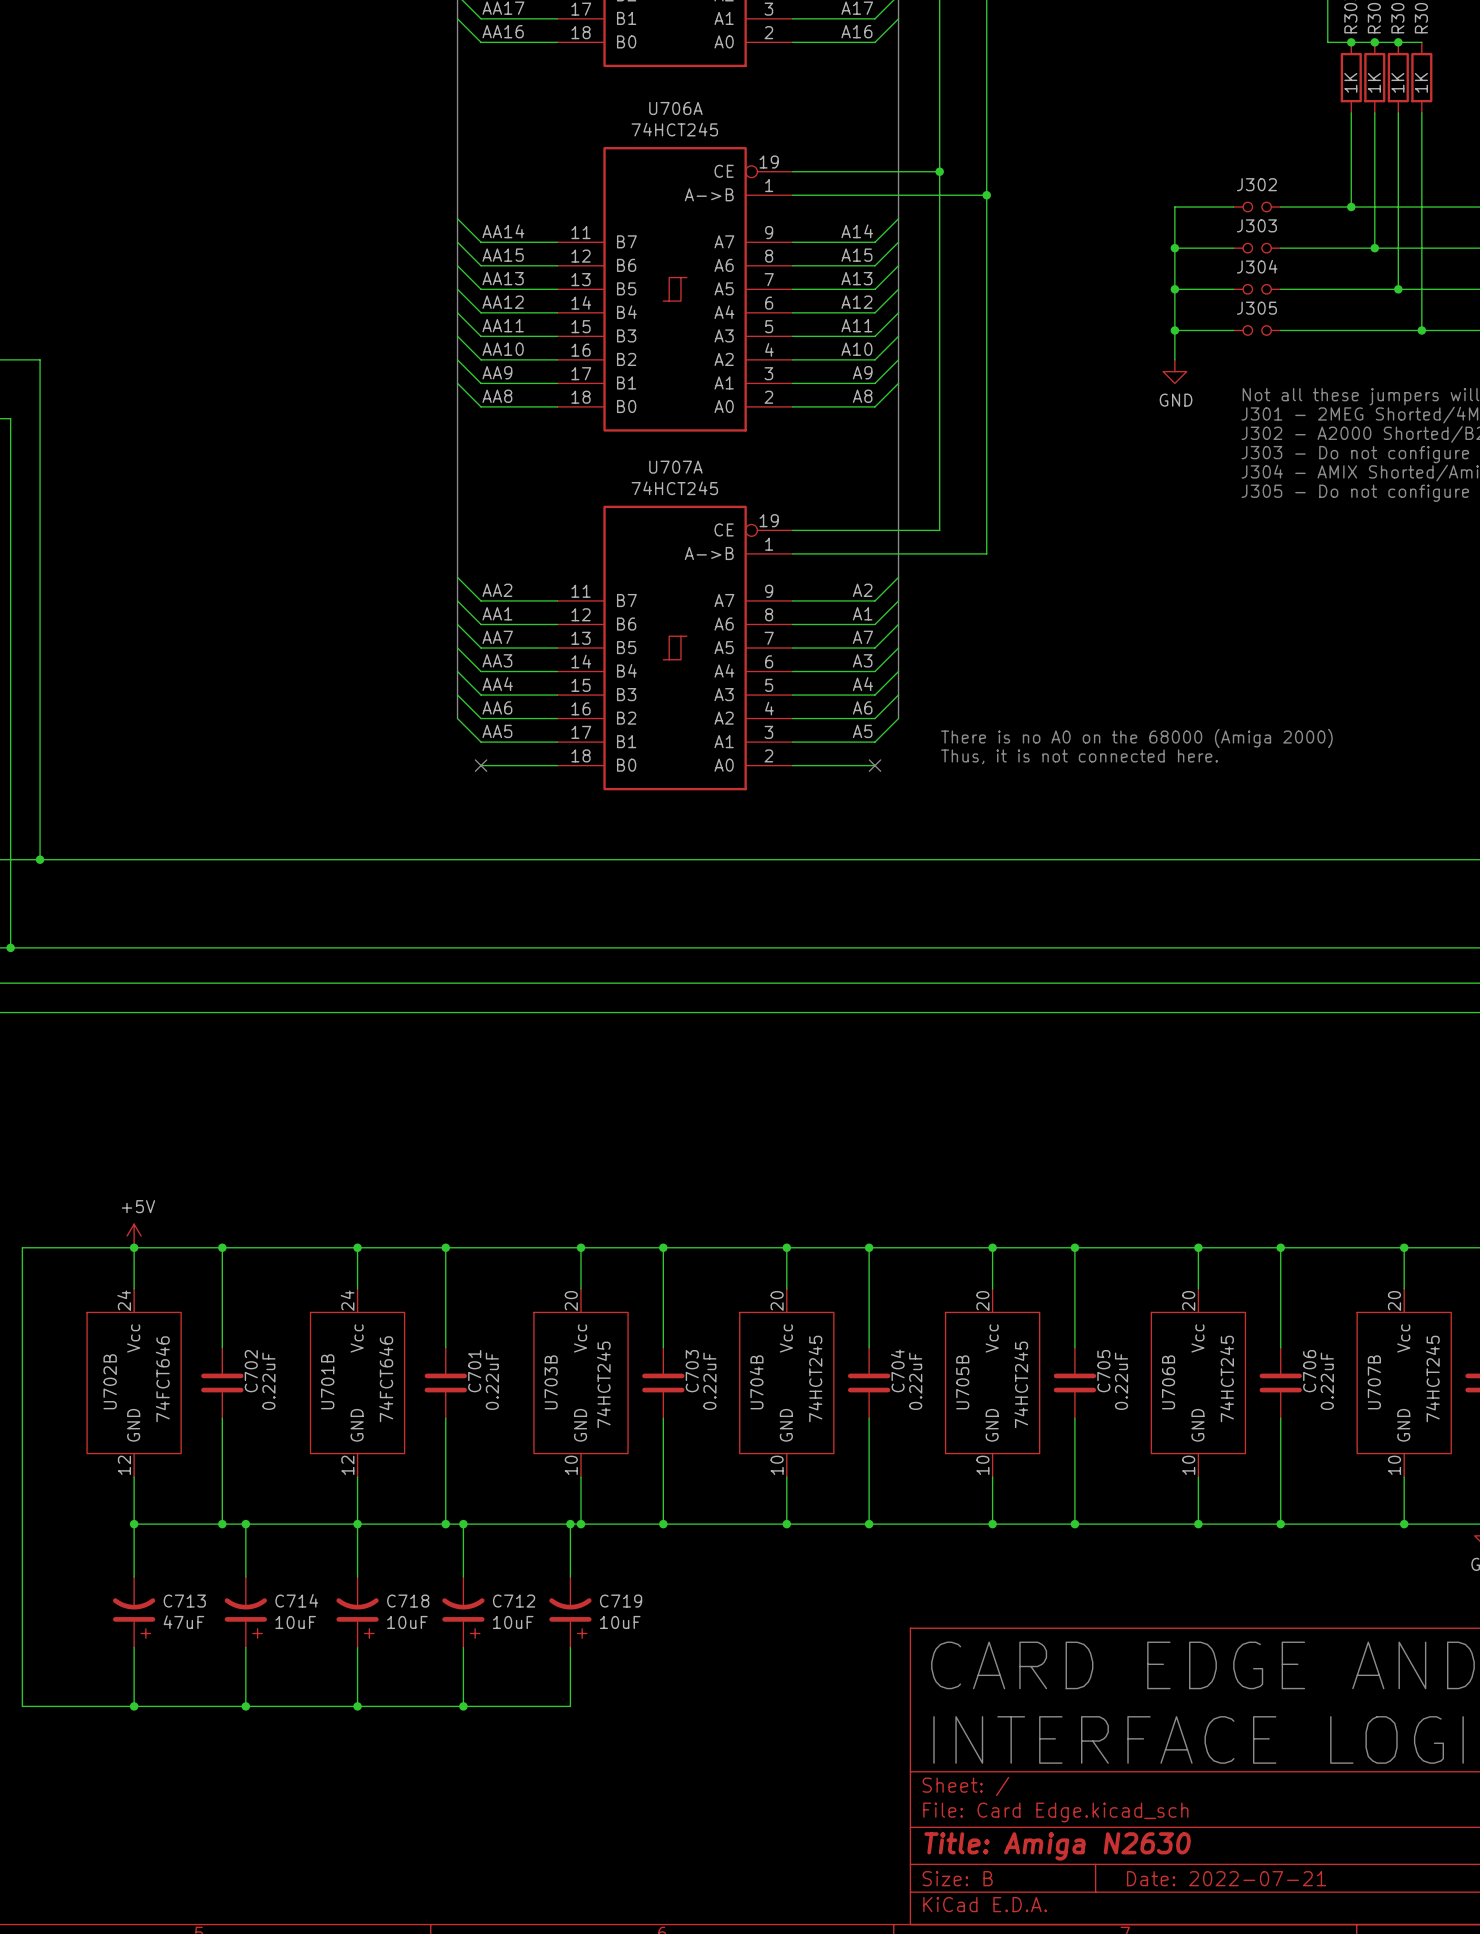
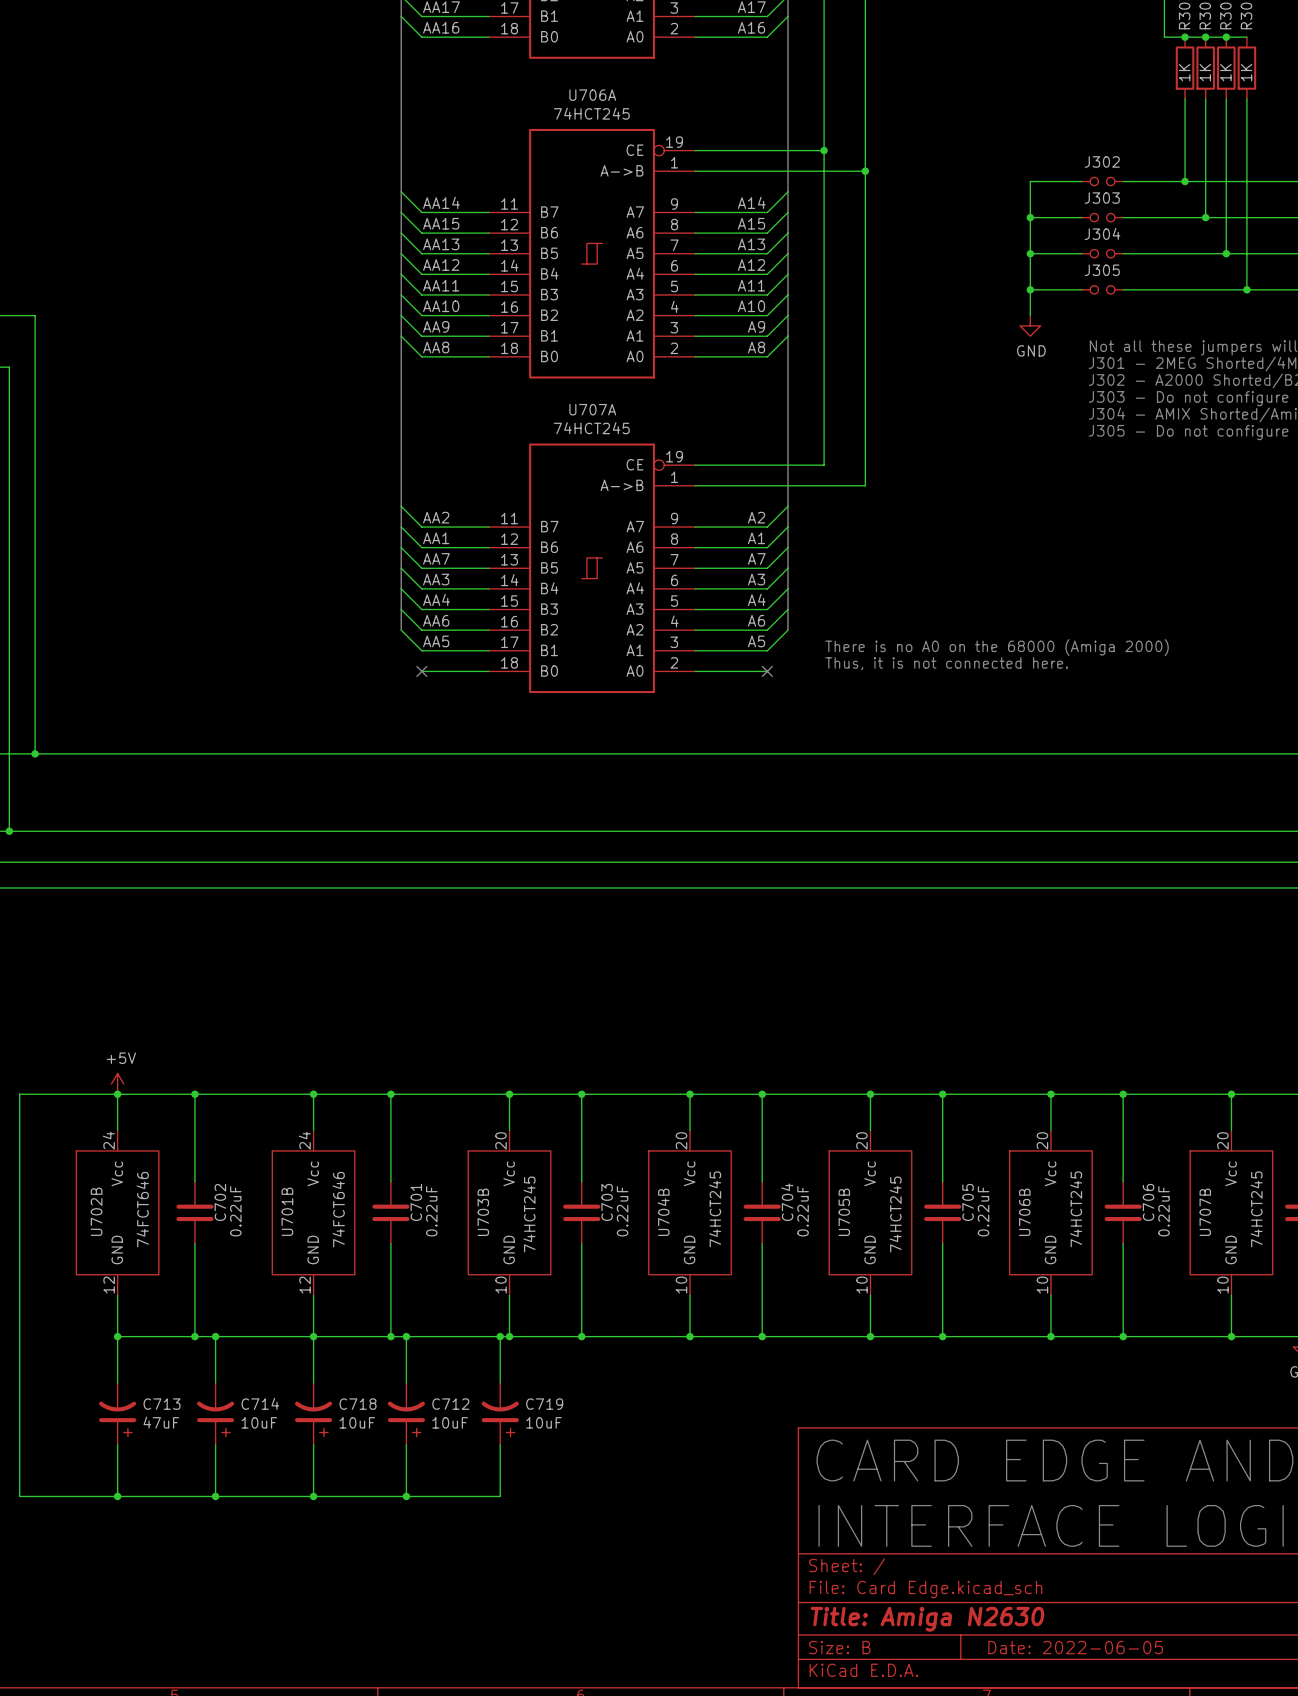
title block: Date: 2022-07-21 (1226, 1878) -> Date: 2022-06-05 (1075, 1647)

